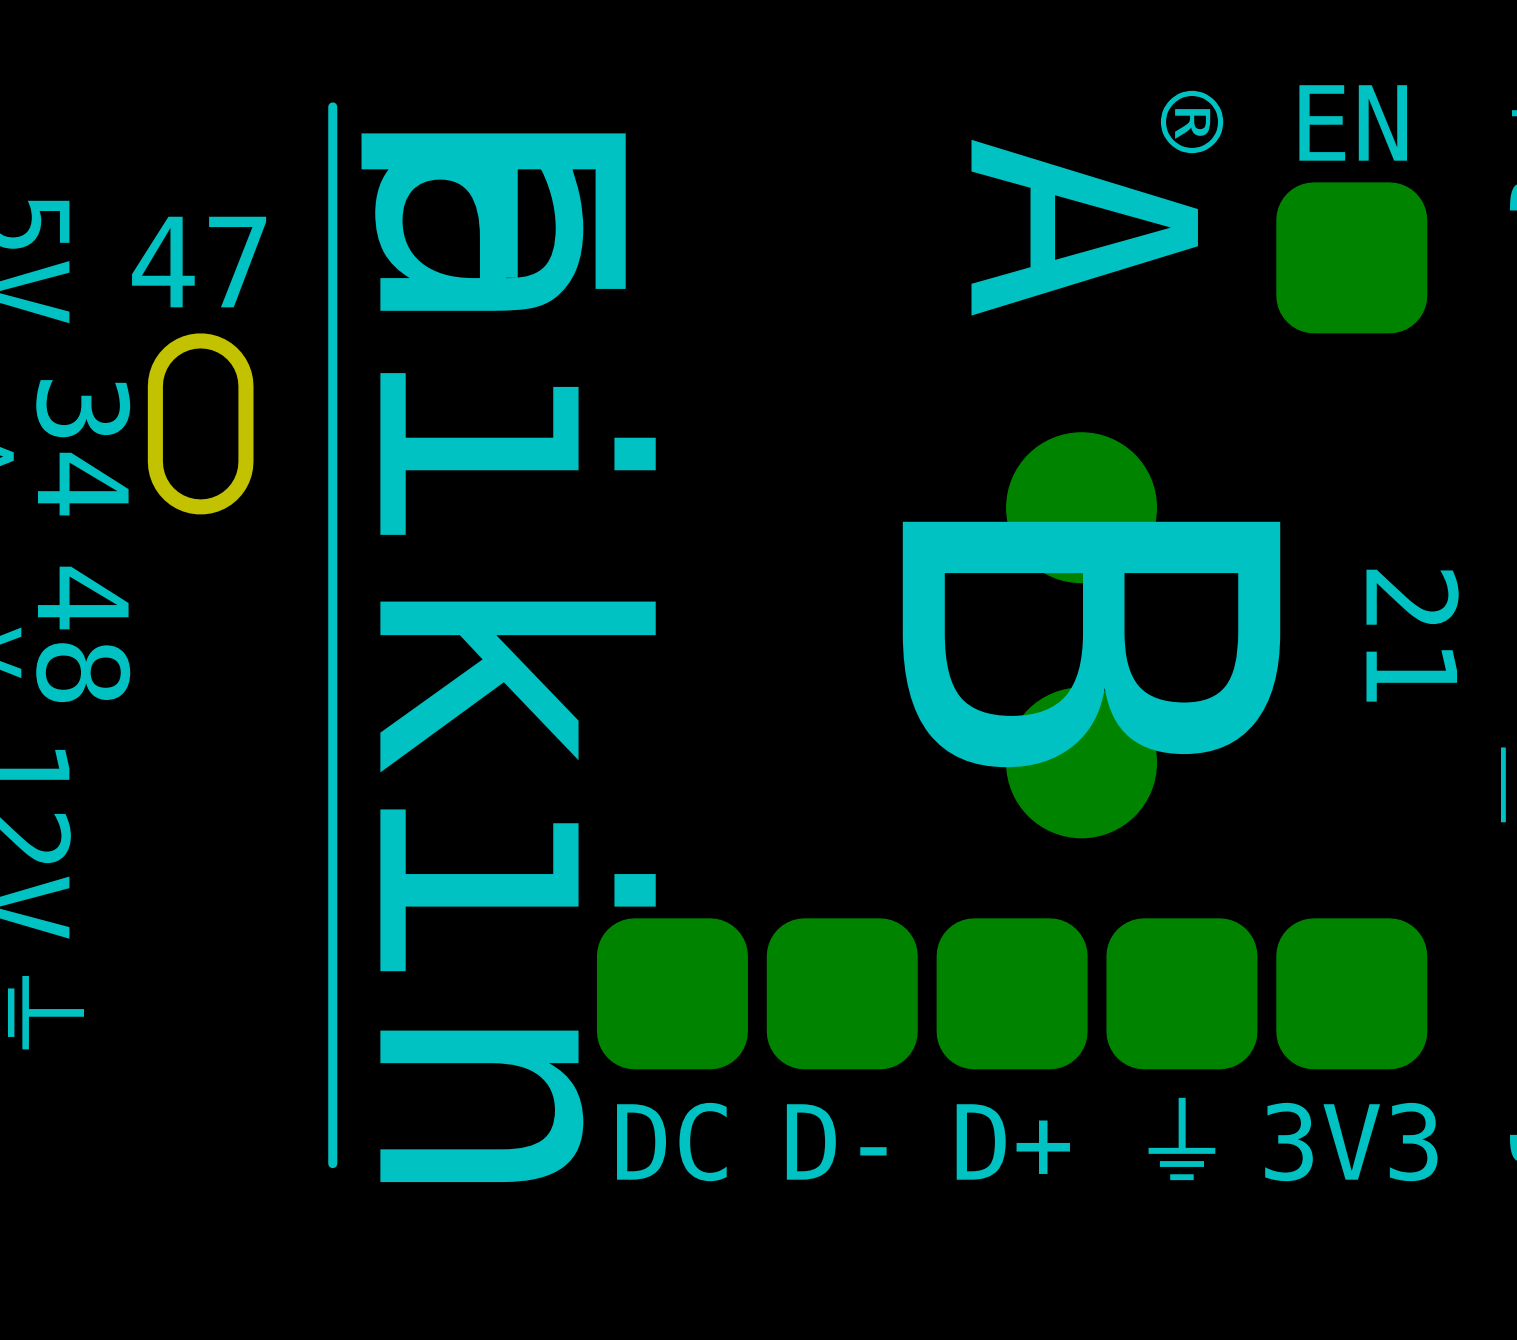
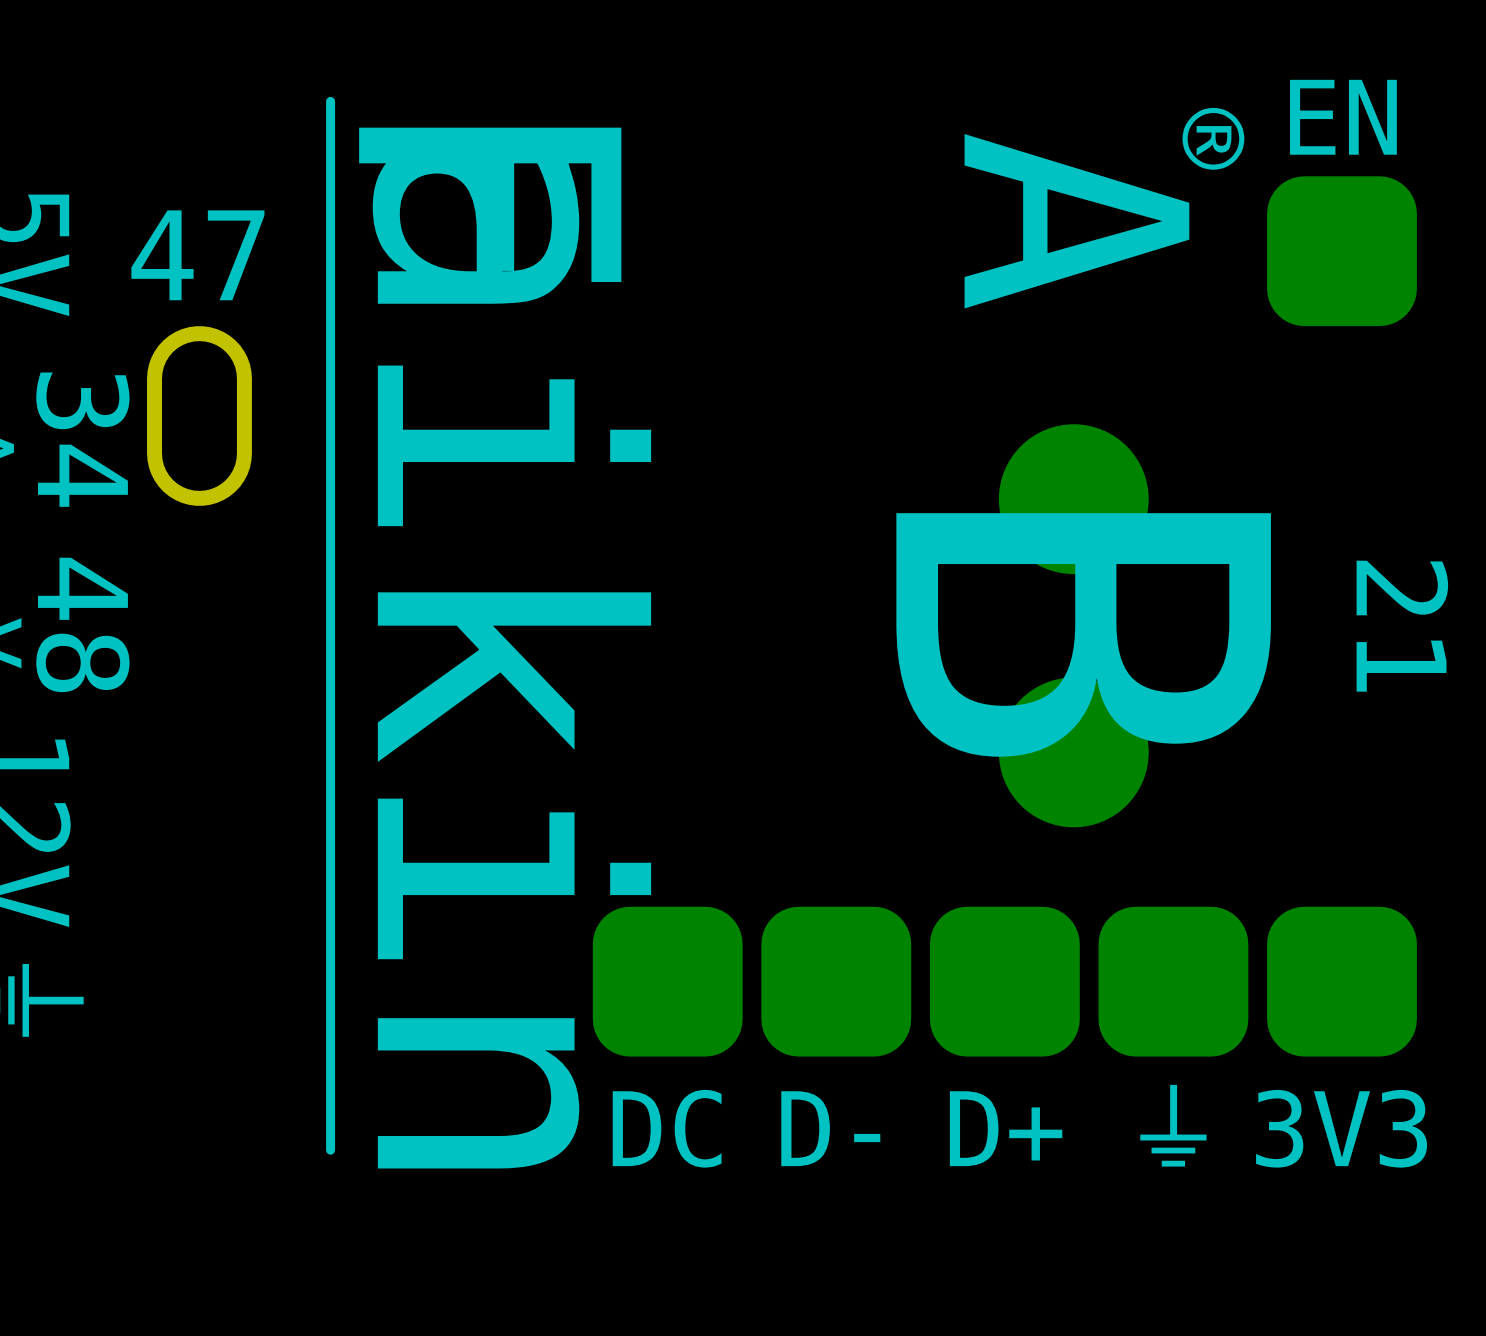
text position: ® (1192, 121) -> ® (1213, 138)

